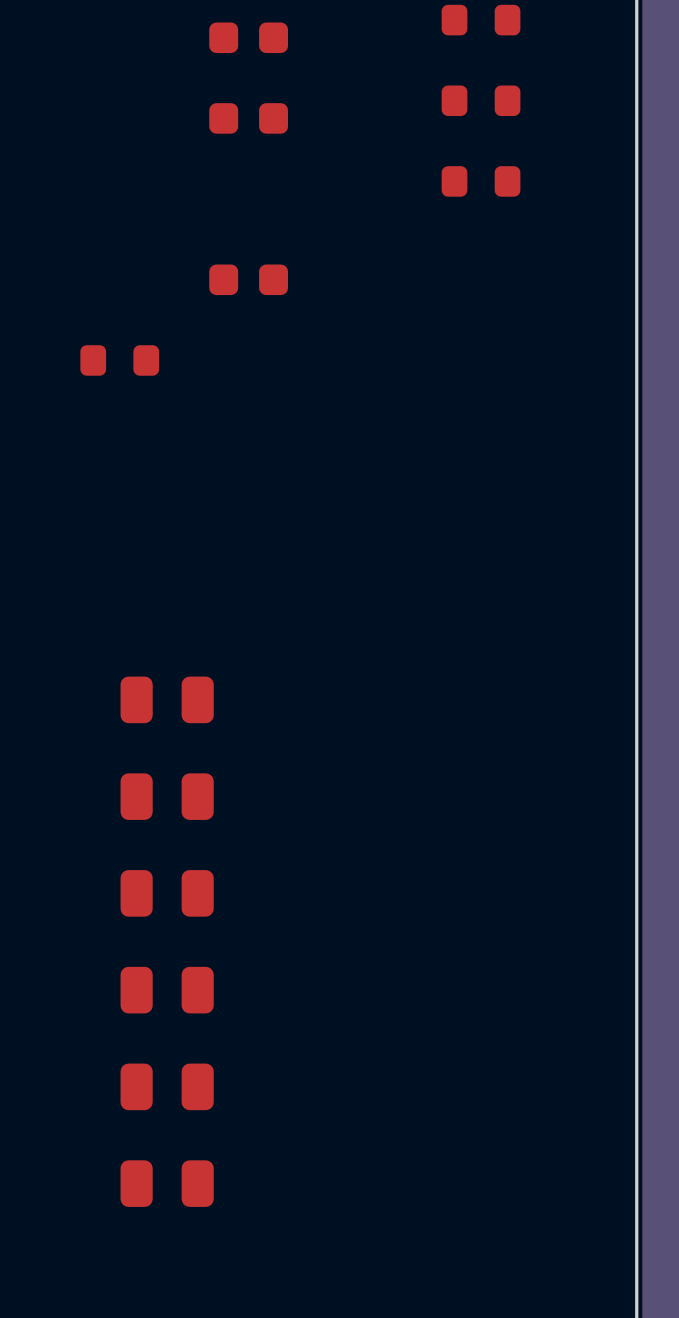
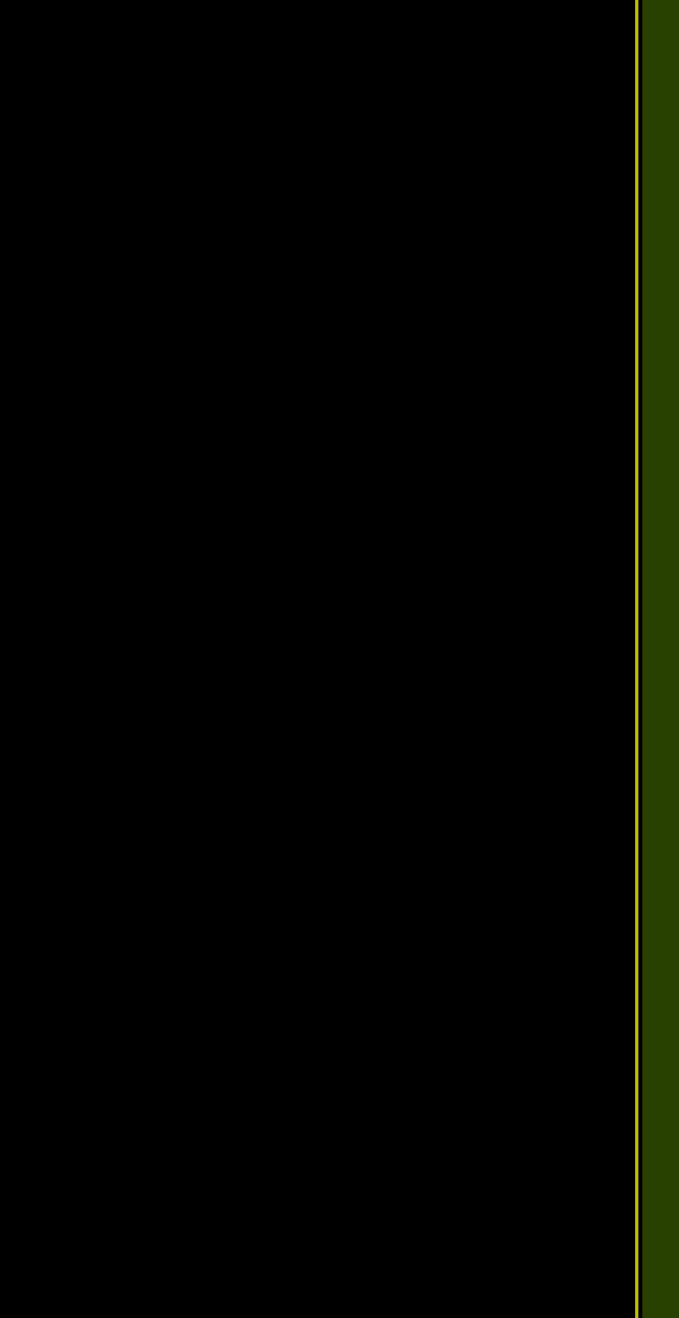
part: (481, 20) -> none
part: (248, 37) -> none
part: (481, 100) -> none
part: (248, 118) -> none
part: (481, 181) -> none
part: (248, 279) -> none
part: (119, 360) -> none
part: (167, 699) -> none
part: (167, 796) -> none
part: (167, 893) -> none
part: (167, 990) -> none
part: (167, 1086) -> none
part: (167, 1183) -> none

